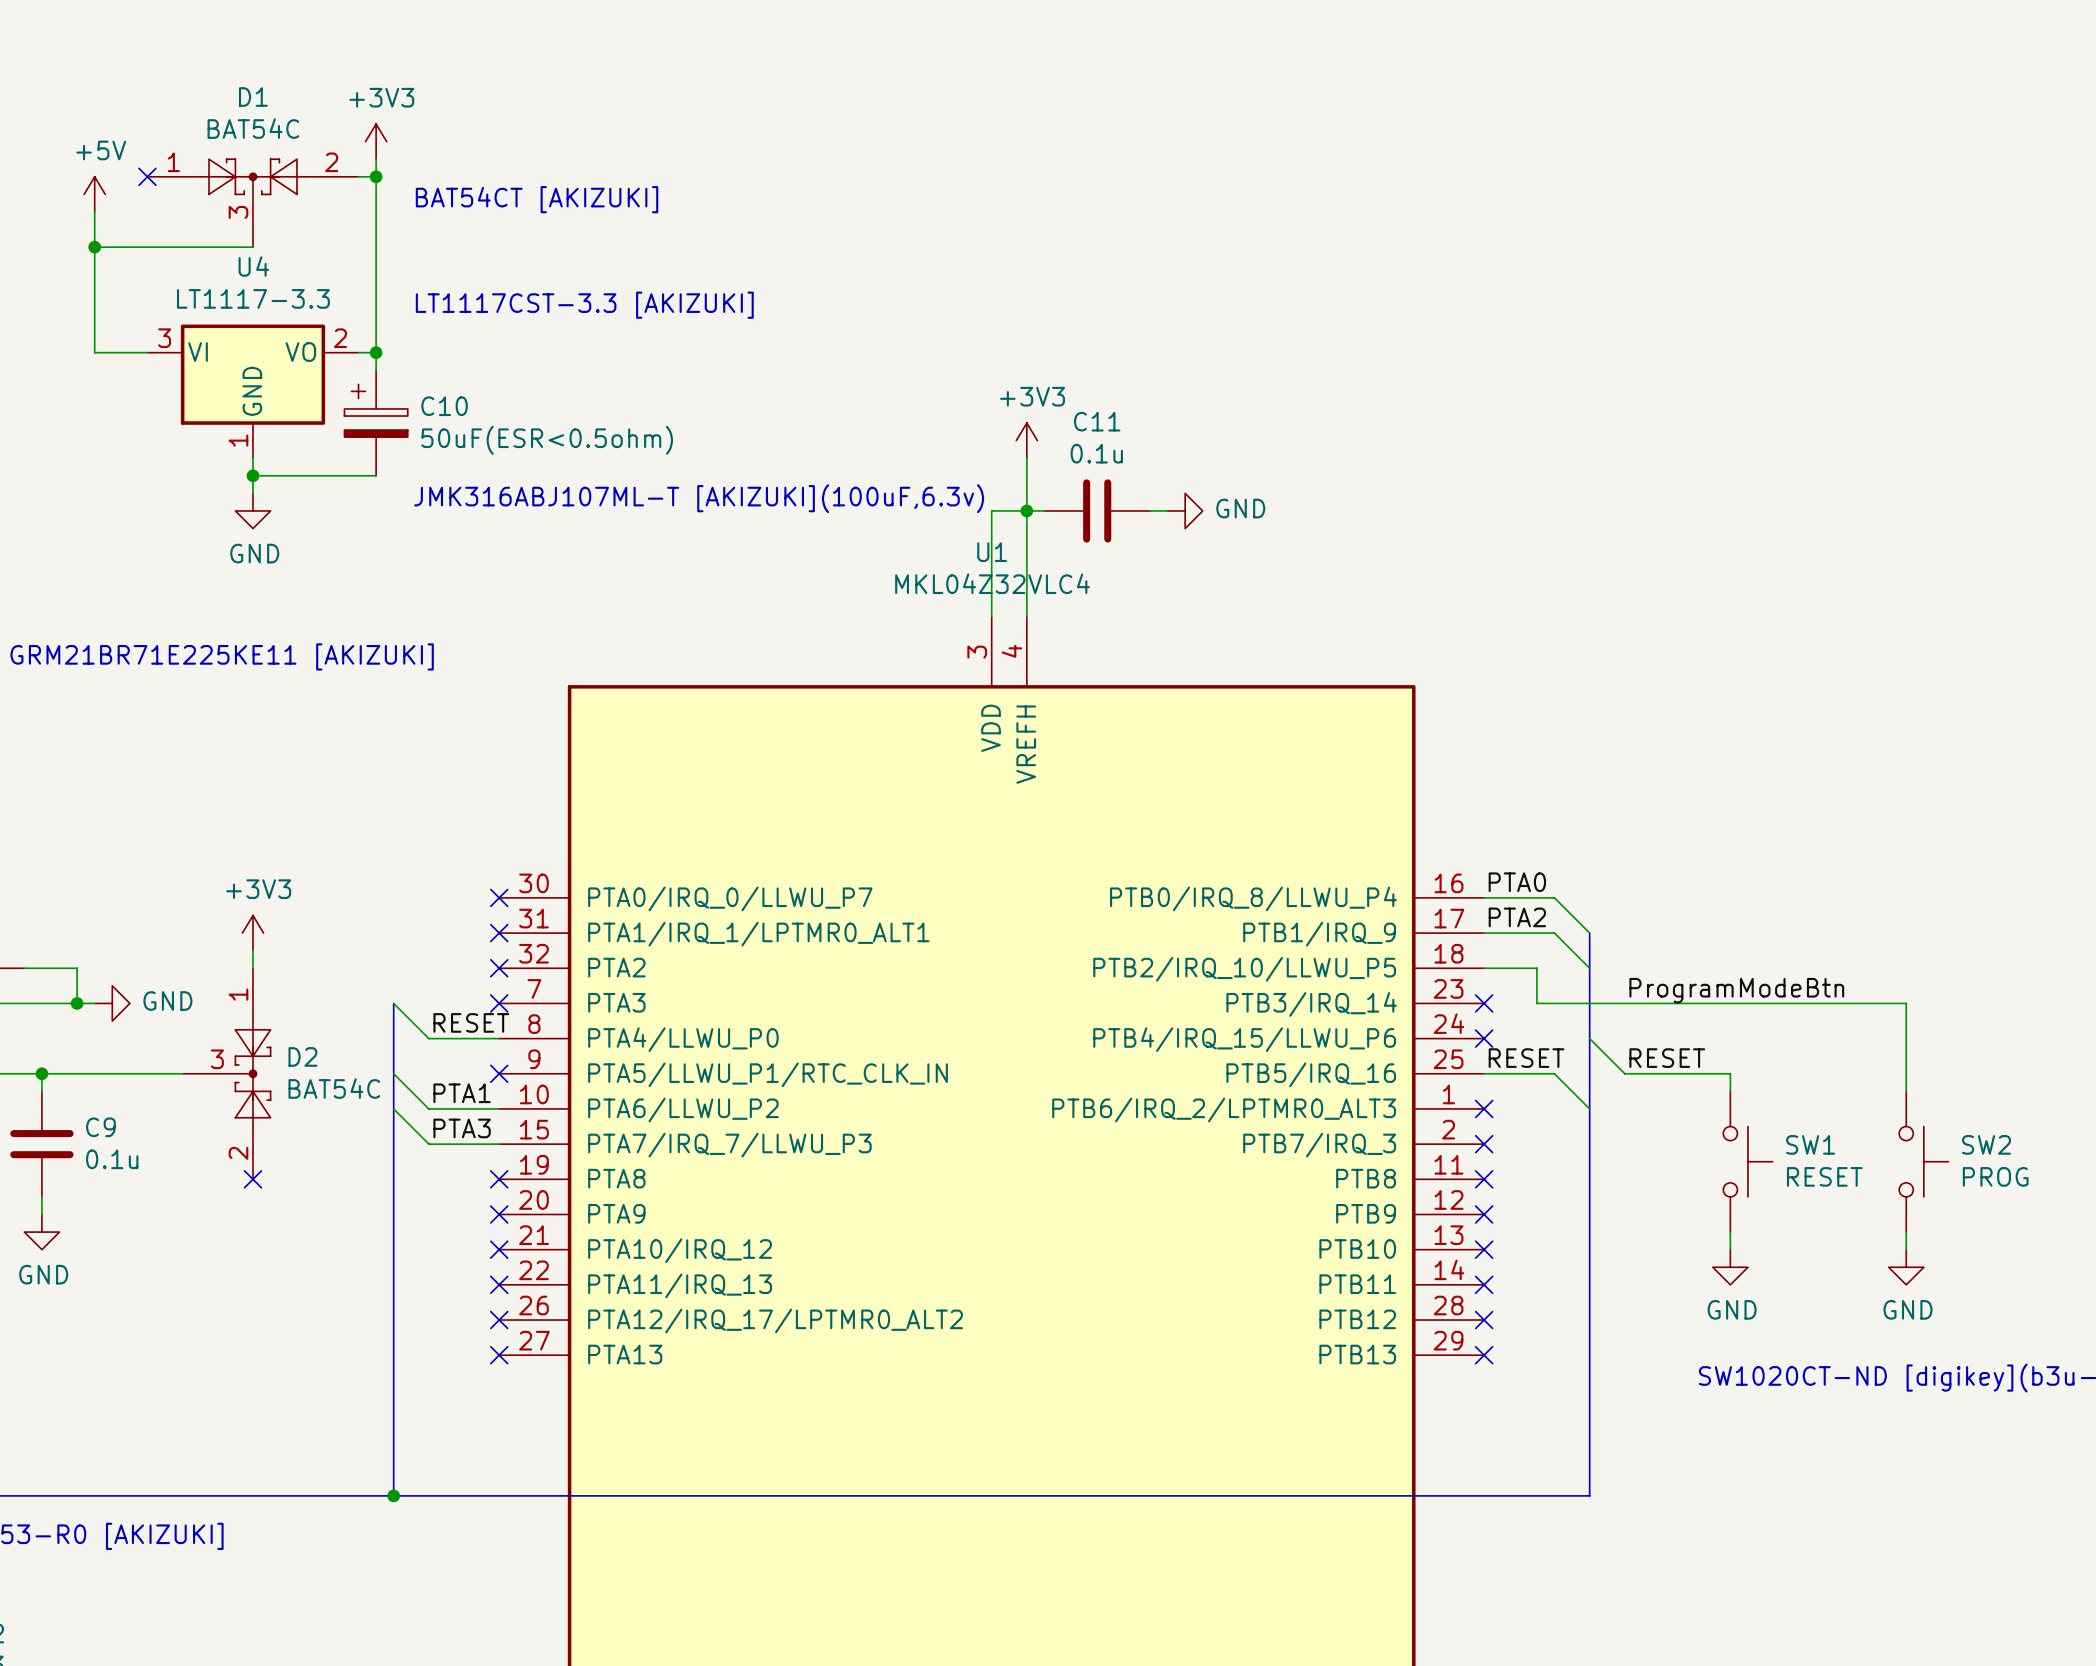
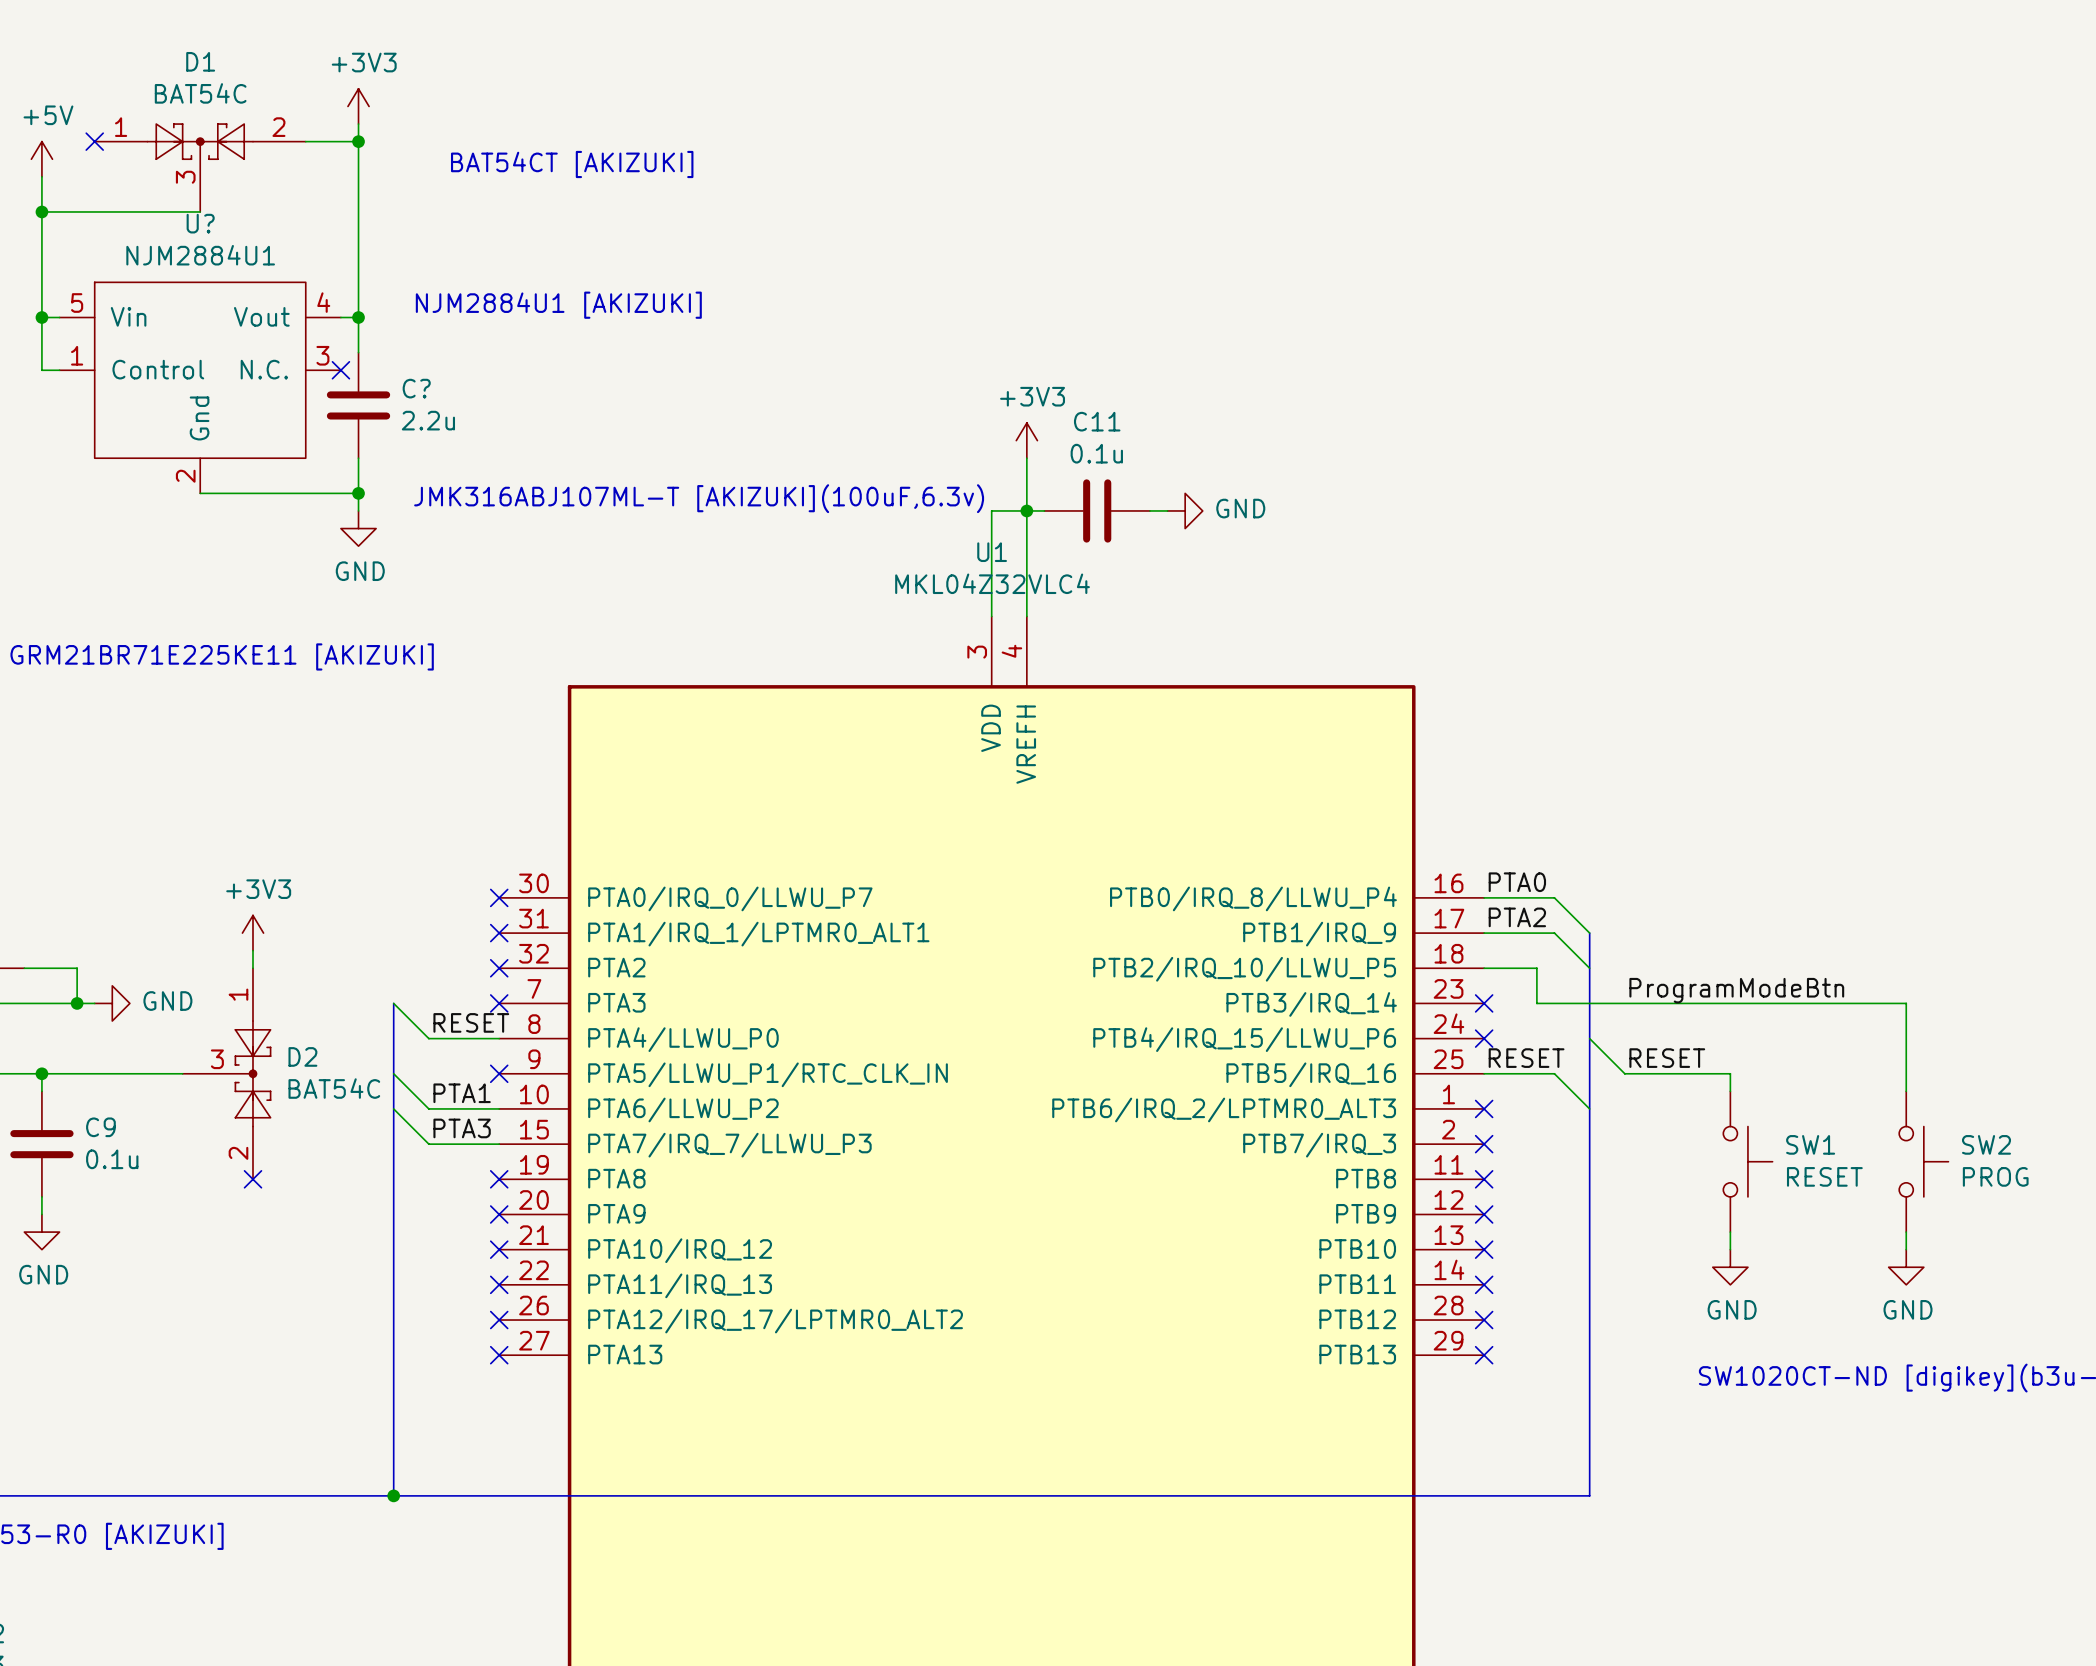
wire: none -> (305, 141) (358, 141)
power symbol position: +3V3 (376, 141) -> +3V3 (358, 106)
wire: (376, 159) (376, 370) -> none
wire: none -> (41, 176) (41, 370) (59, 370)
no-connect mark position: (147, 176) -> (94, 141)
wire: (358, 176) (376, 176) -> (340, 317) (358, 317)
junction position: (376, 176) -> (358, 141)
power symbol position: +5V (94, 194) -> +5V (41, 159)
text position: BAT54CT [AKIZUKI] (537, 199) -> BAT54CT [AKIZUKI] (572, 164)
D1 position: (252, 203) -> (200, 168)
junction: none -> (41, 211)
wire: (94, 211) (94, 352) (147, 352) -> none
wire: (94, 247) (252, 247) -> (41, 211) (200, 211)
junction: (94, 247) -> none
text: LT1117CST-3.3 [AKIZUKI] (584, 305) -> NJM2884U1 [AKIZUKI] (558, 305)
wire: none -> (41, 317) (59, 317)
junction: none -> (41, 317)
wire: (358, 352) (376, 352) -> (358, 352) (358, 124)
junction position: (376, 352) -> (358, 317)
no-connect mark: none -> (340, 370)
U?: none -> NJM2884U1 (200, 387)
U4: LT1117-3.3 (252, 391) -> none
C?: none -> 2.2u (358, 405)
C10: 50uF(ESR<0.5ohm) (376, 423) -> none
wire: (252, 458) (252, 493) -> none
wire: none -> (358, 458) (358, 510)
wire: (252, 475) (376, 475) -> none
junction: (252, 475) -> none
wire: none -> (200, 493) (358, 493)
junction: none -> (358, 493)
power symbol position: GND (252, 510) -> GND (358, 528)

